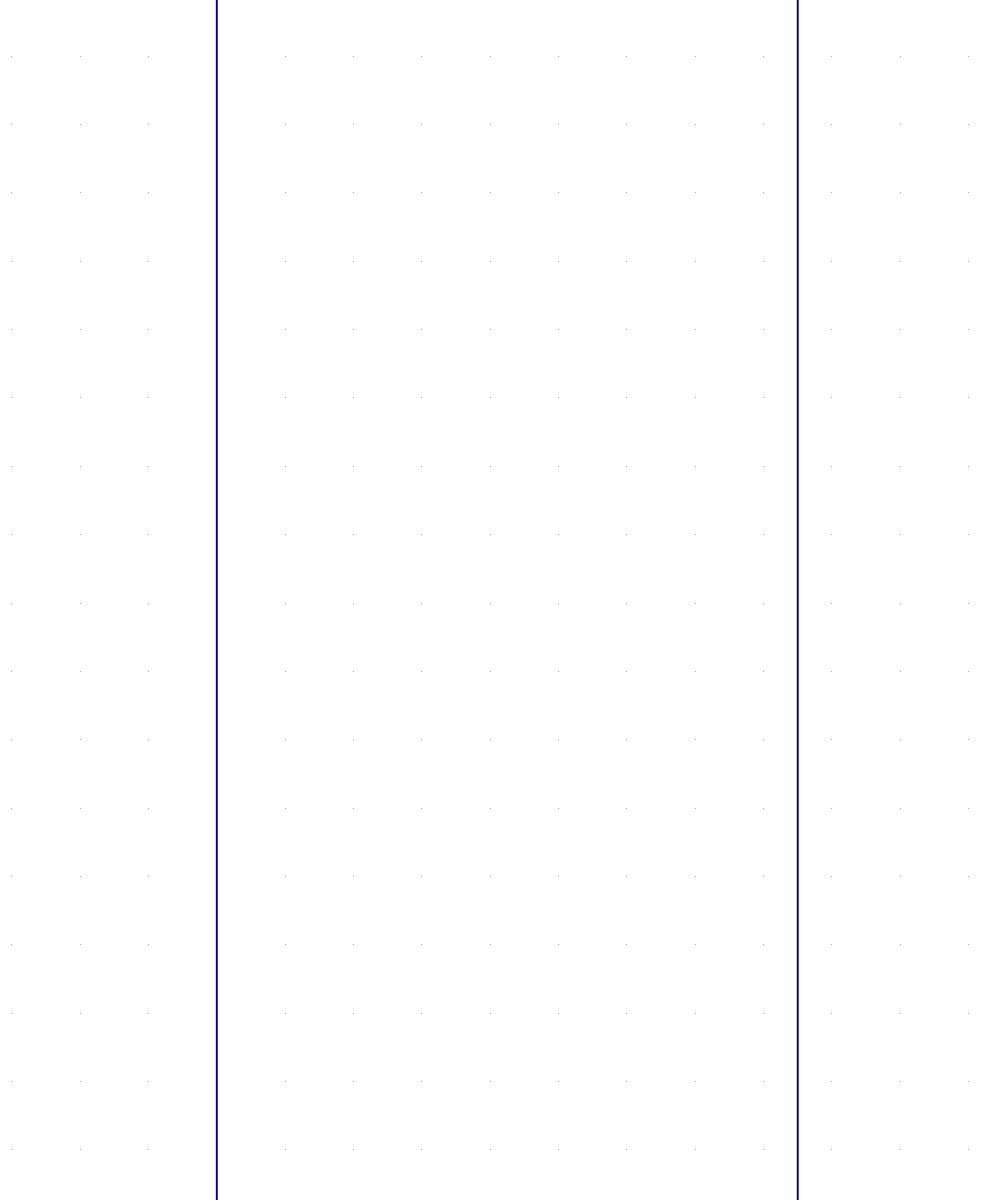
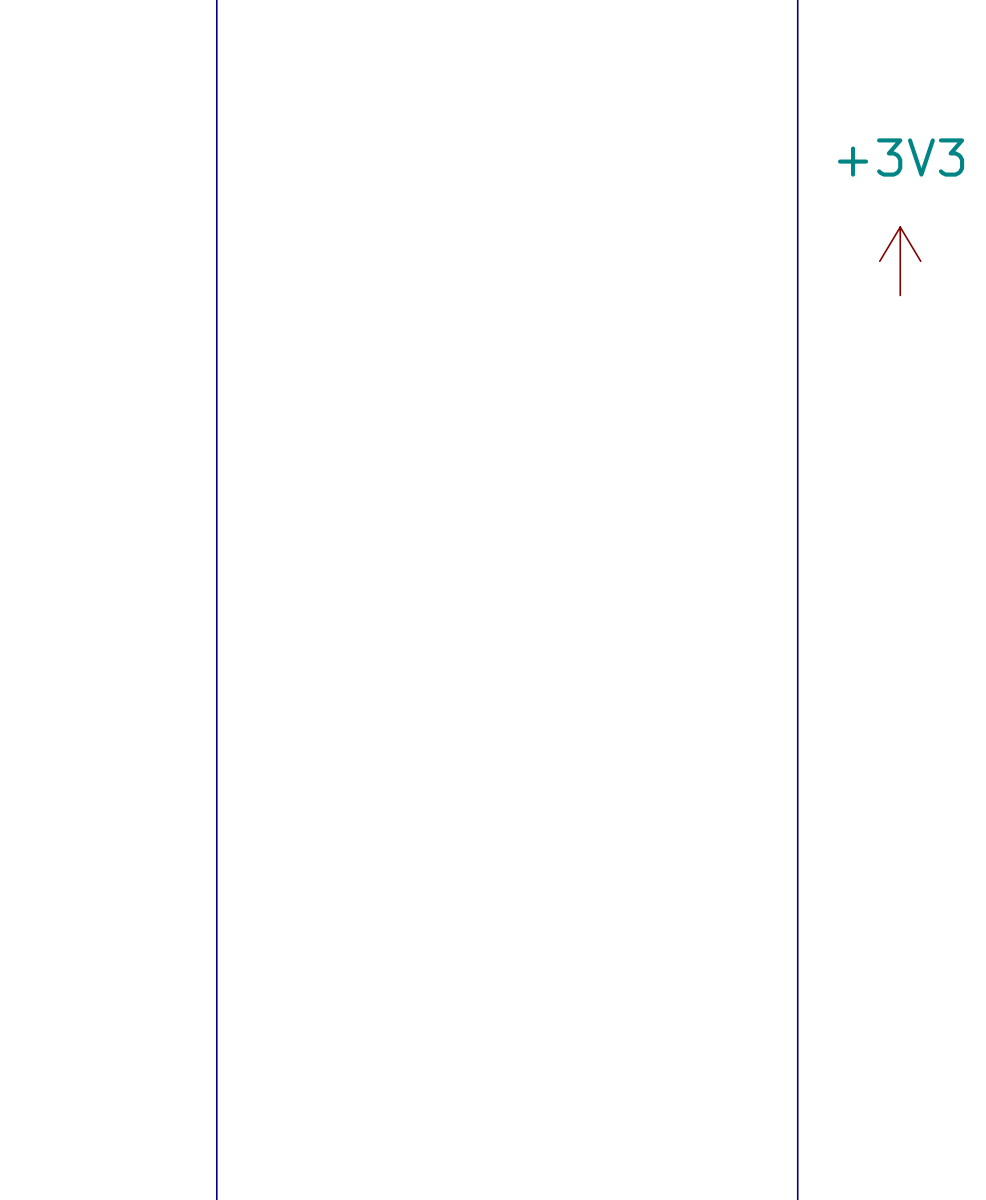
power symbol: none -> +3V3 (900, 261)

